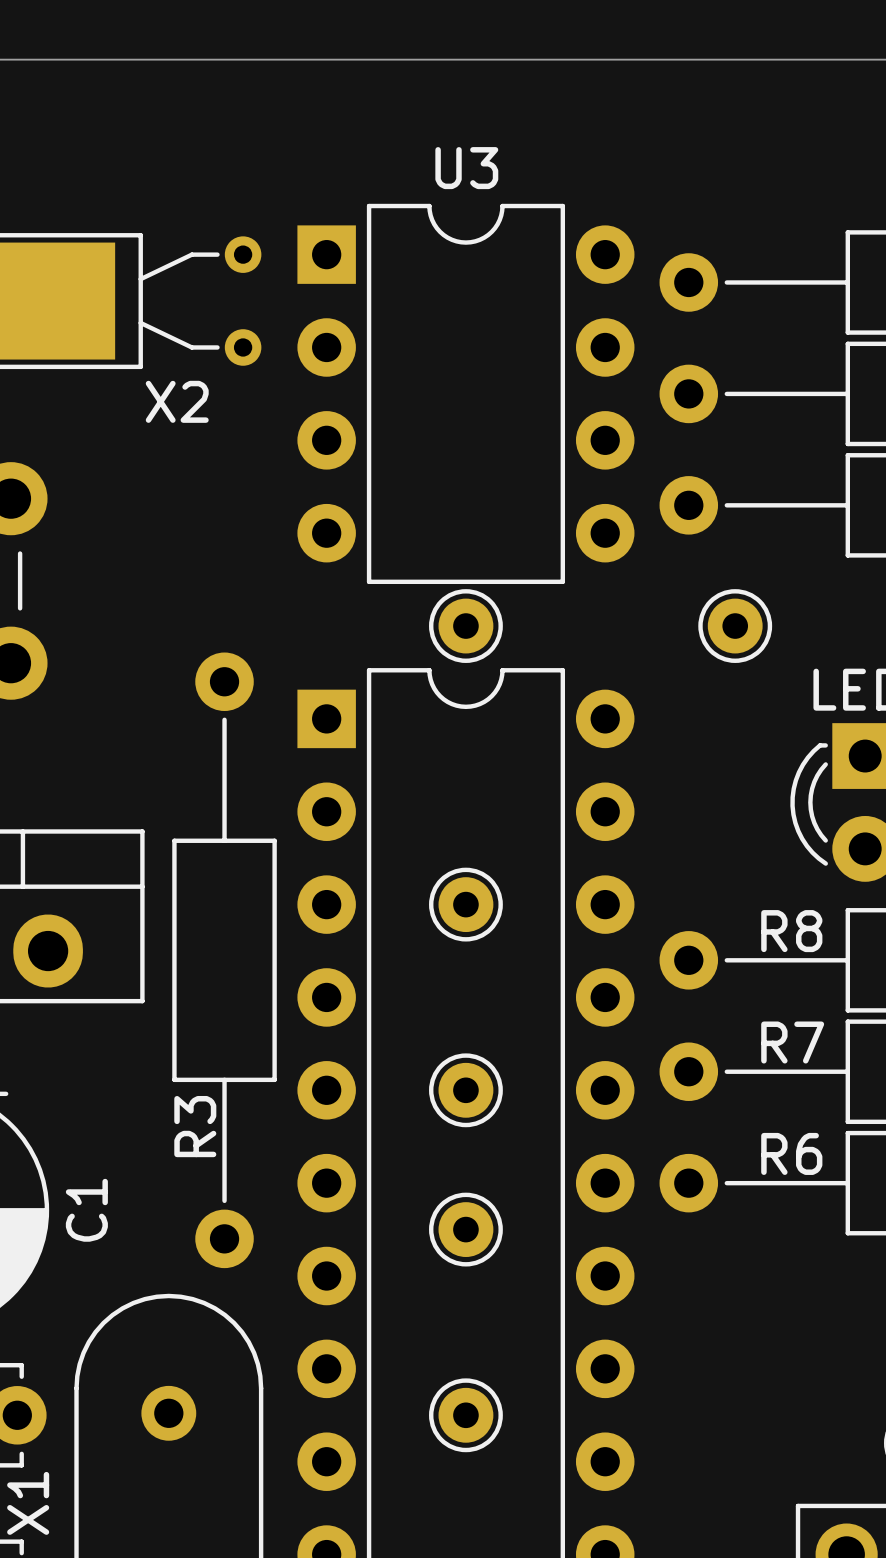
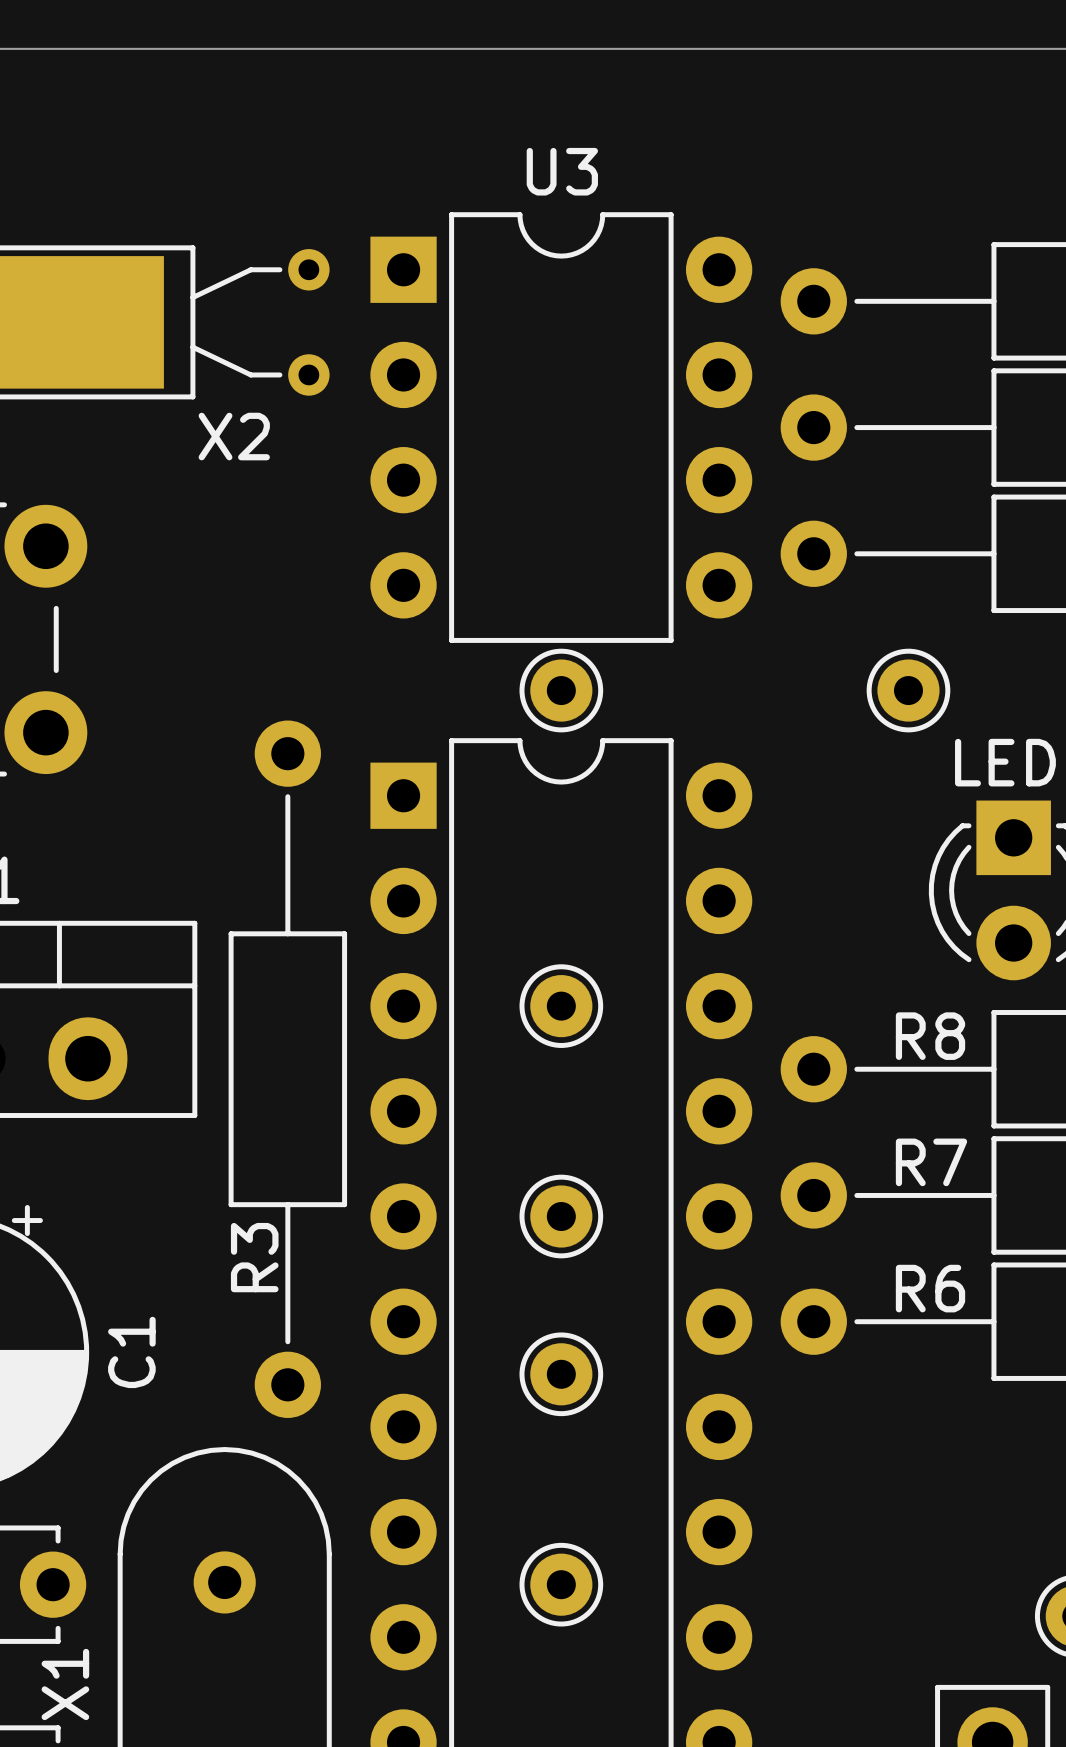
part position: (735, 626) -> (908, 690)

